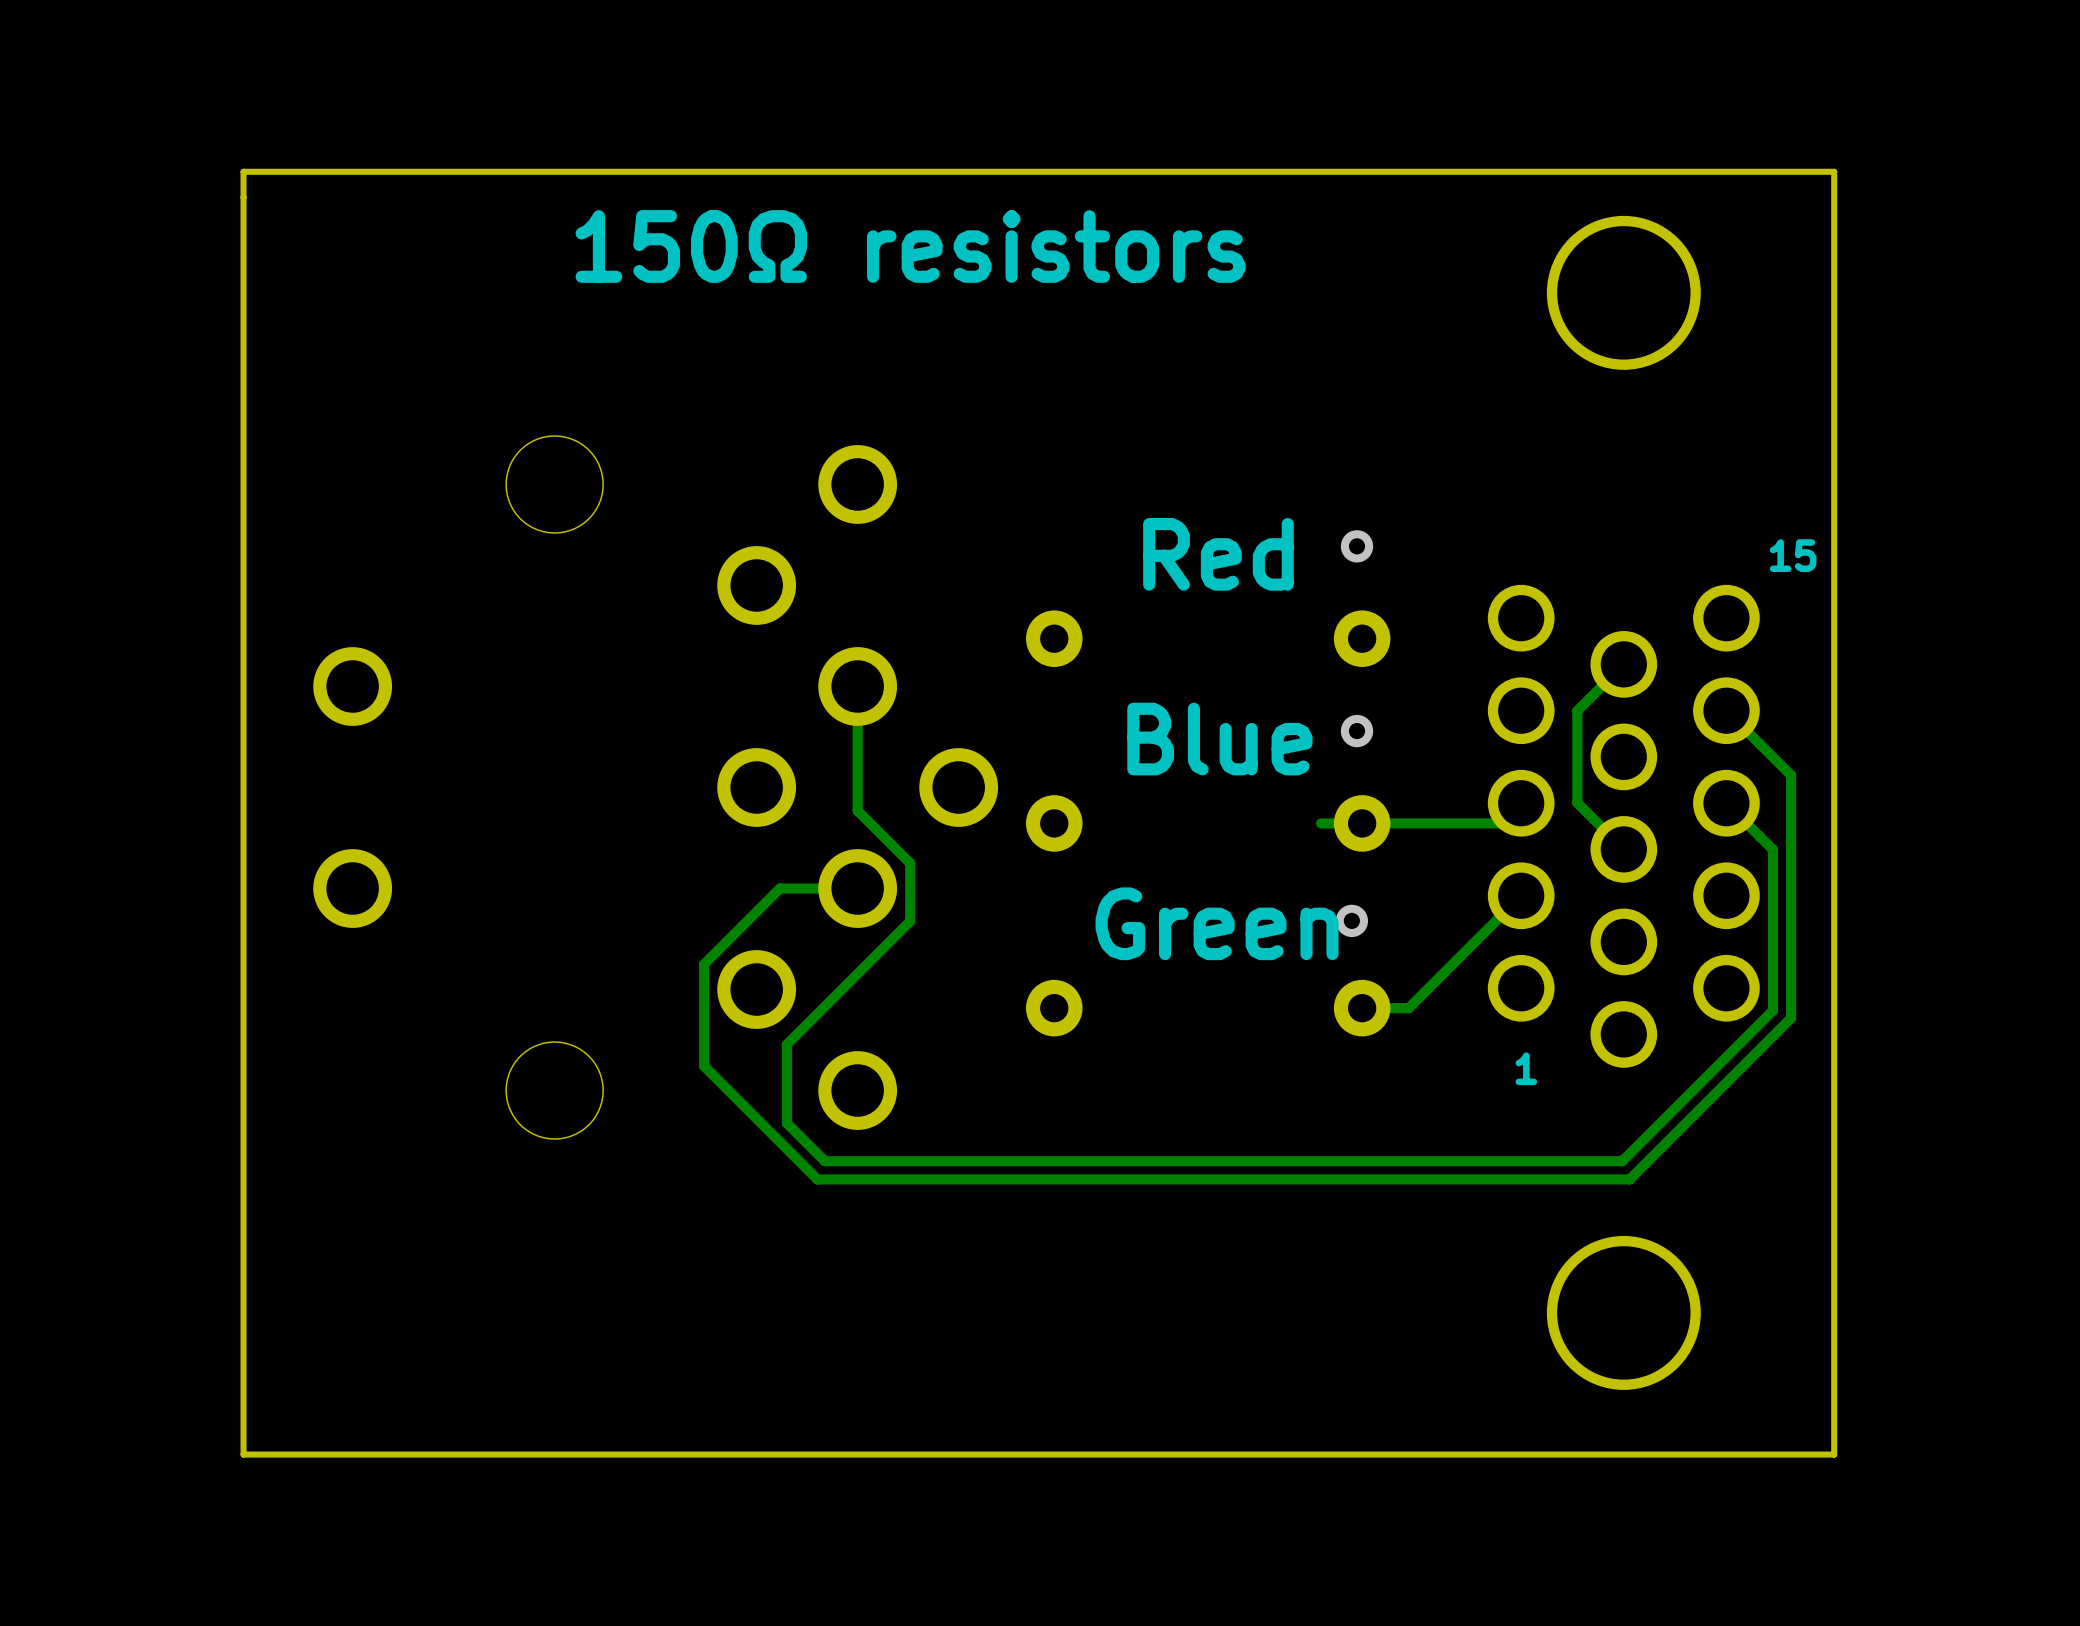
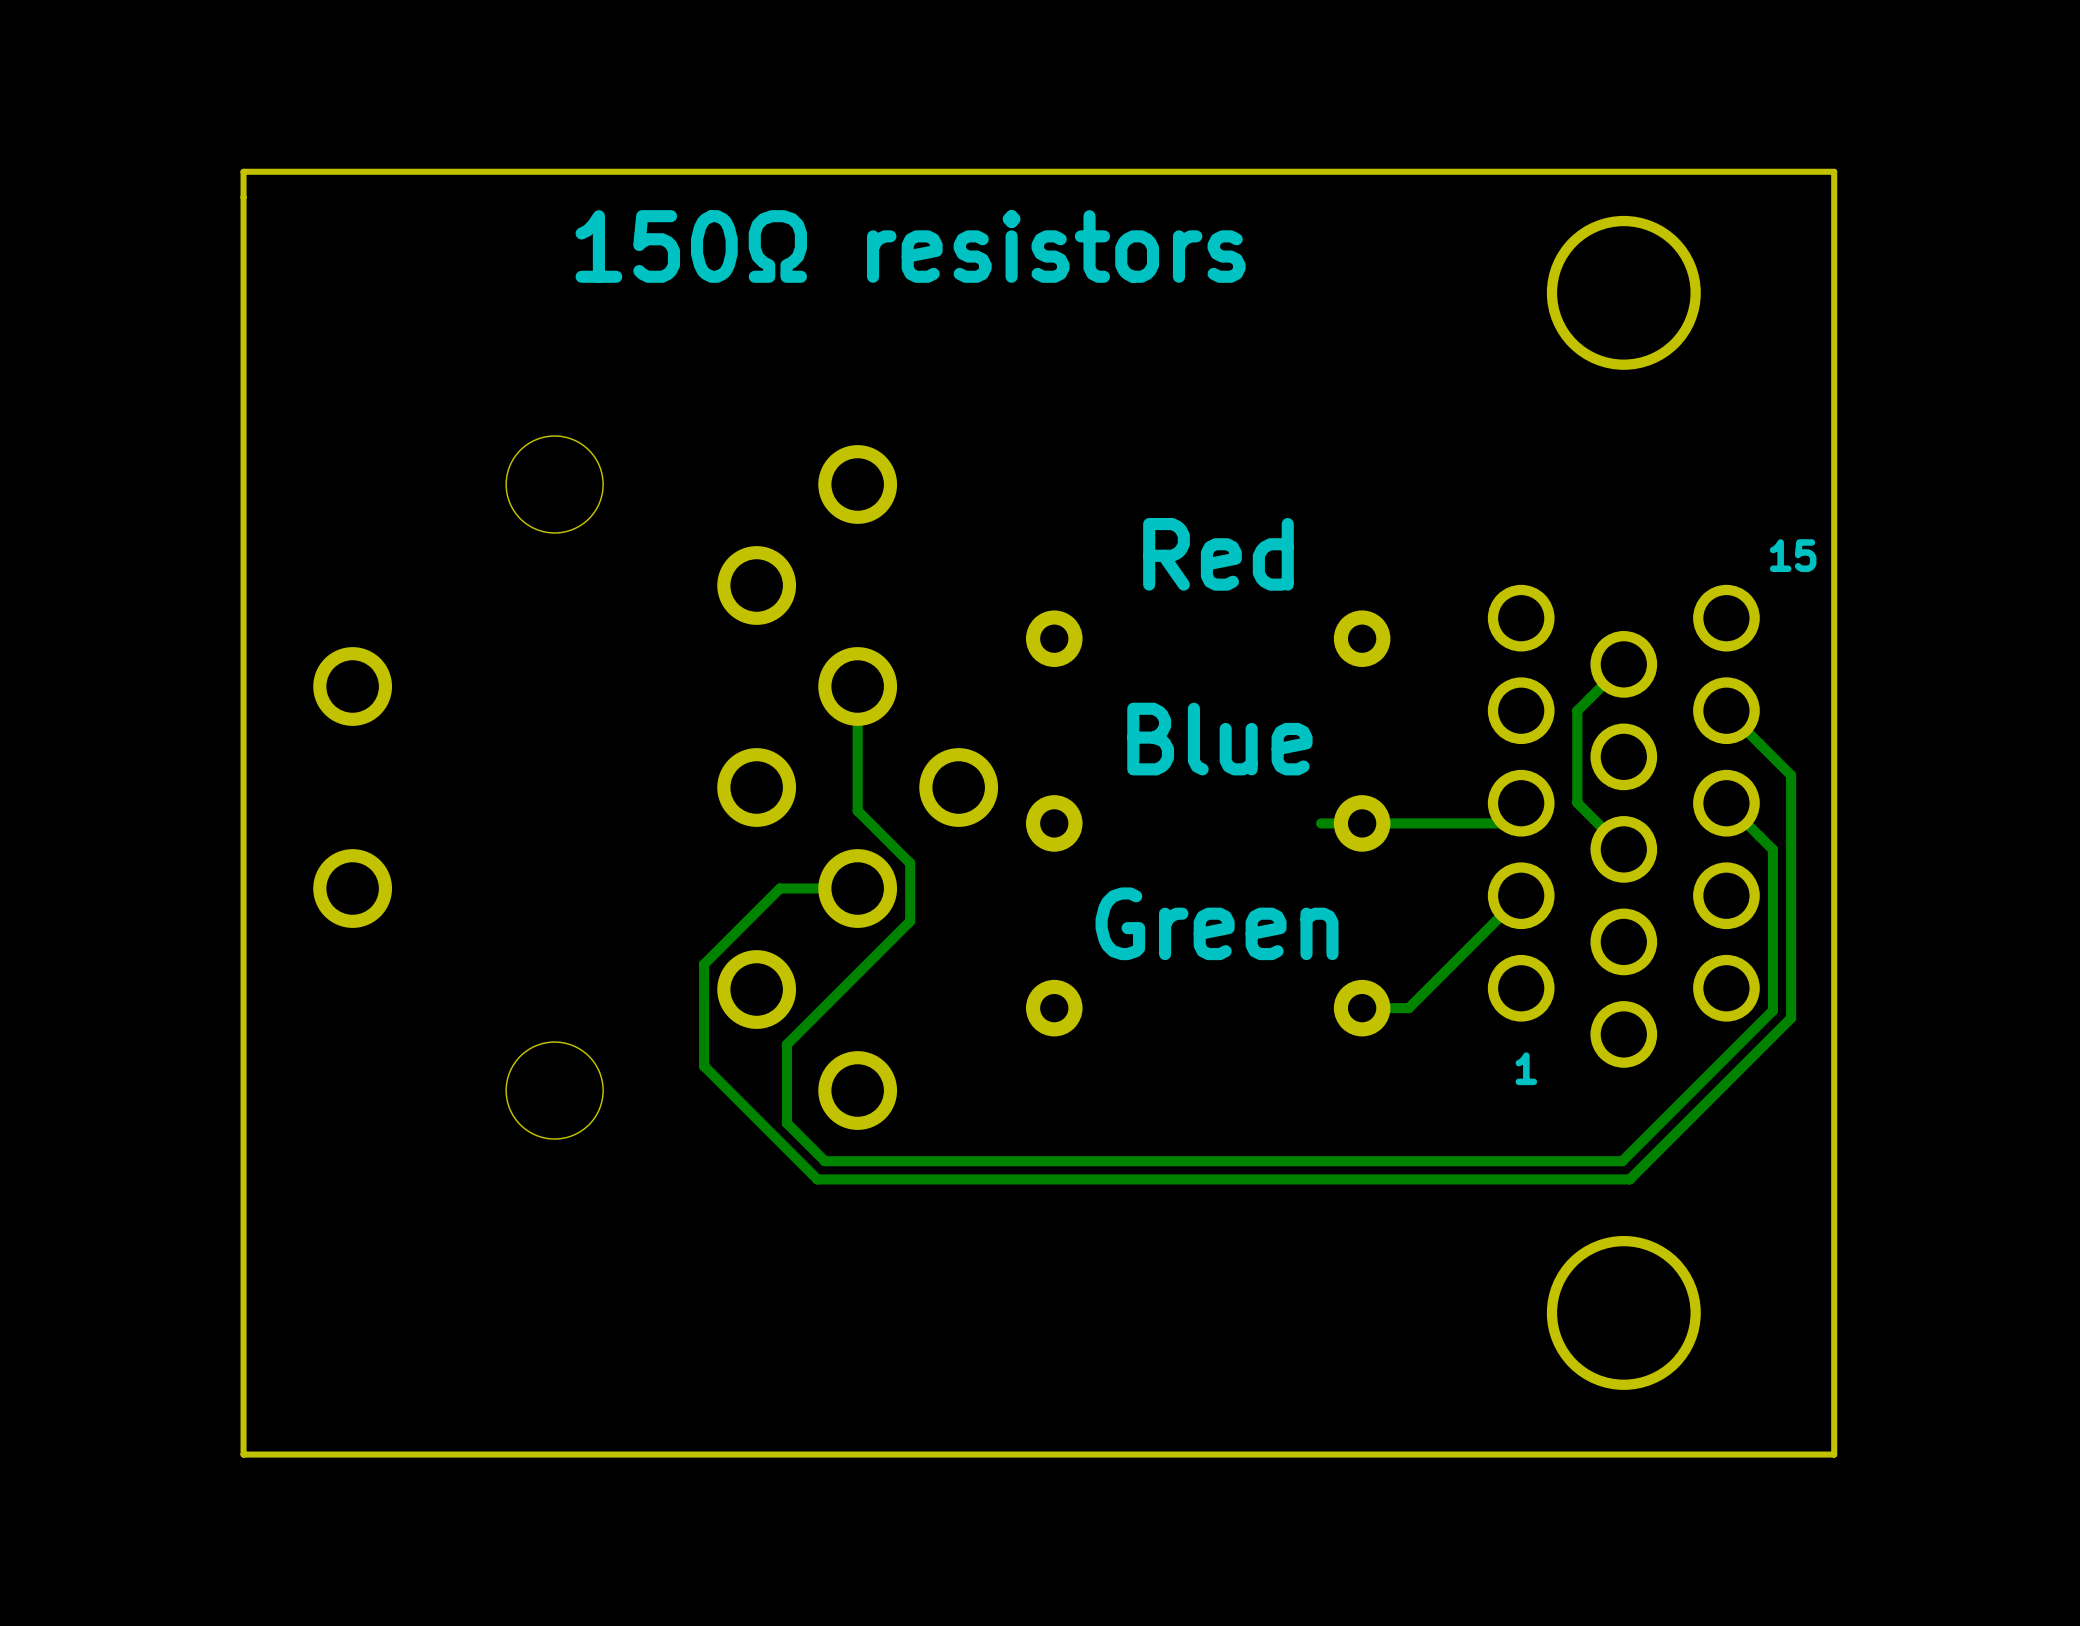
via: (1357, 546) -> none
via: (1357, 731) -> none
via: (1351, 920) -> none

